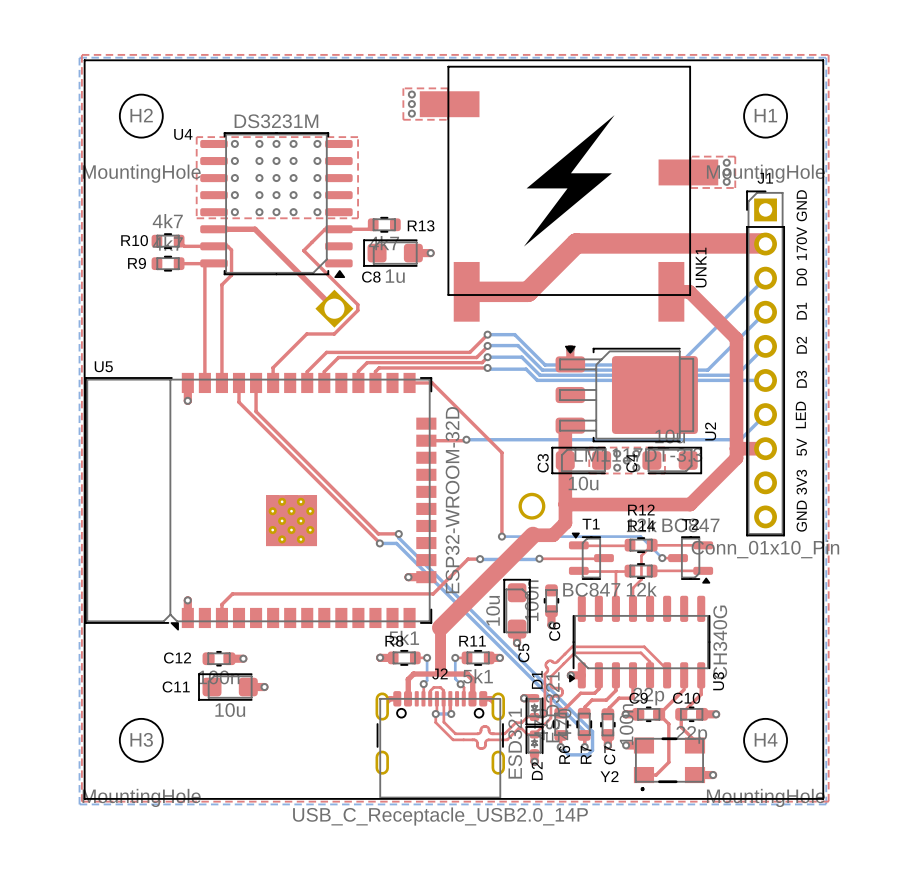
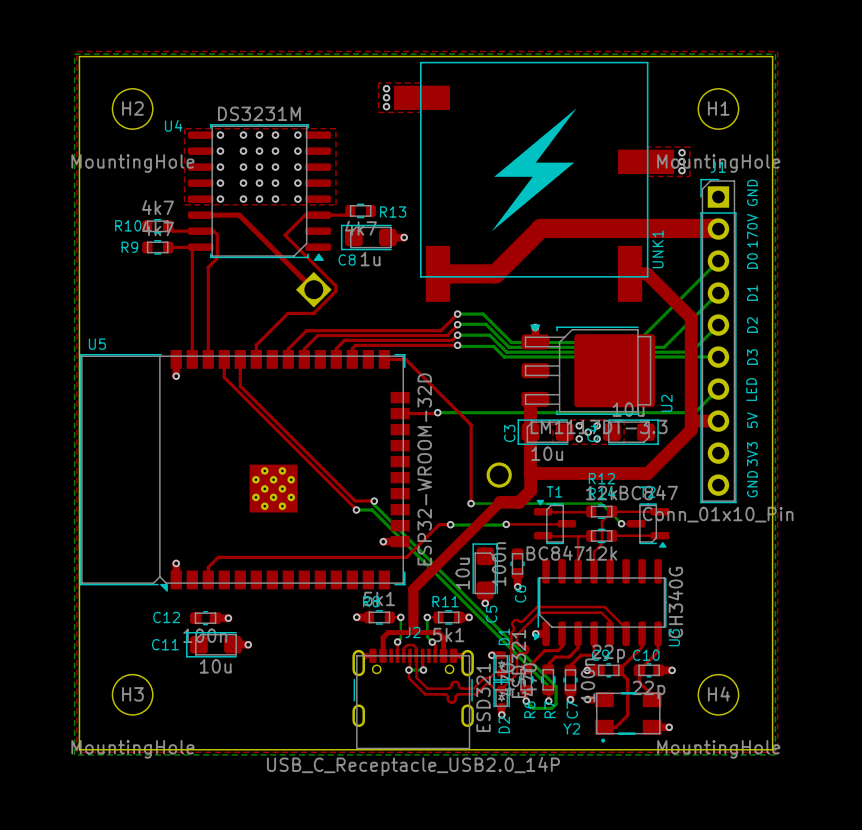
top track width: thick (532, 535) (440, 627) -> thin (500, 502) (413, 589)

